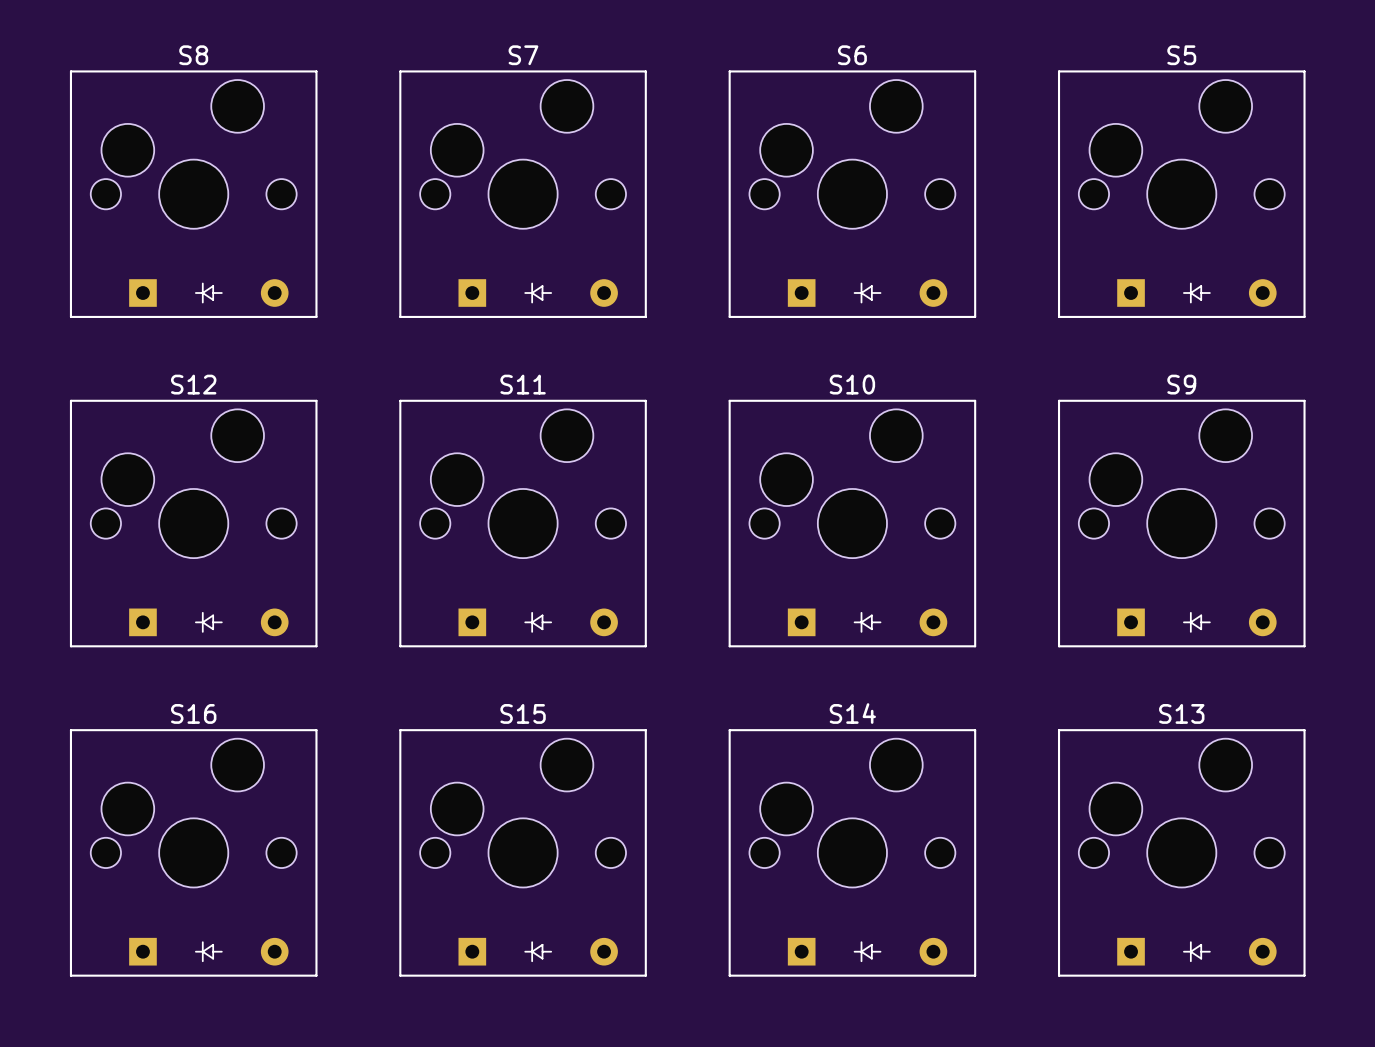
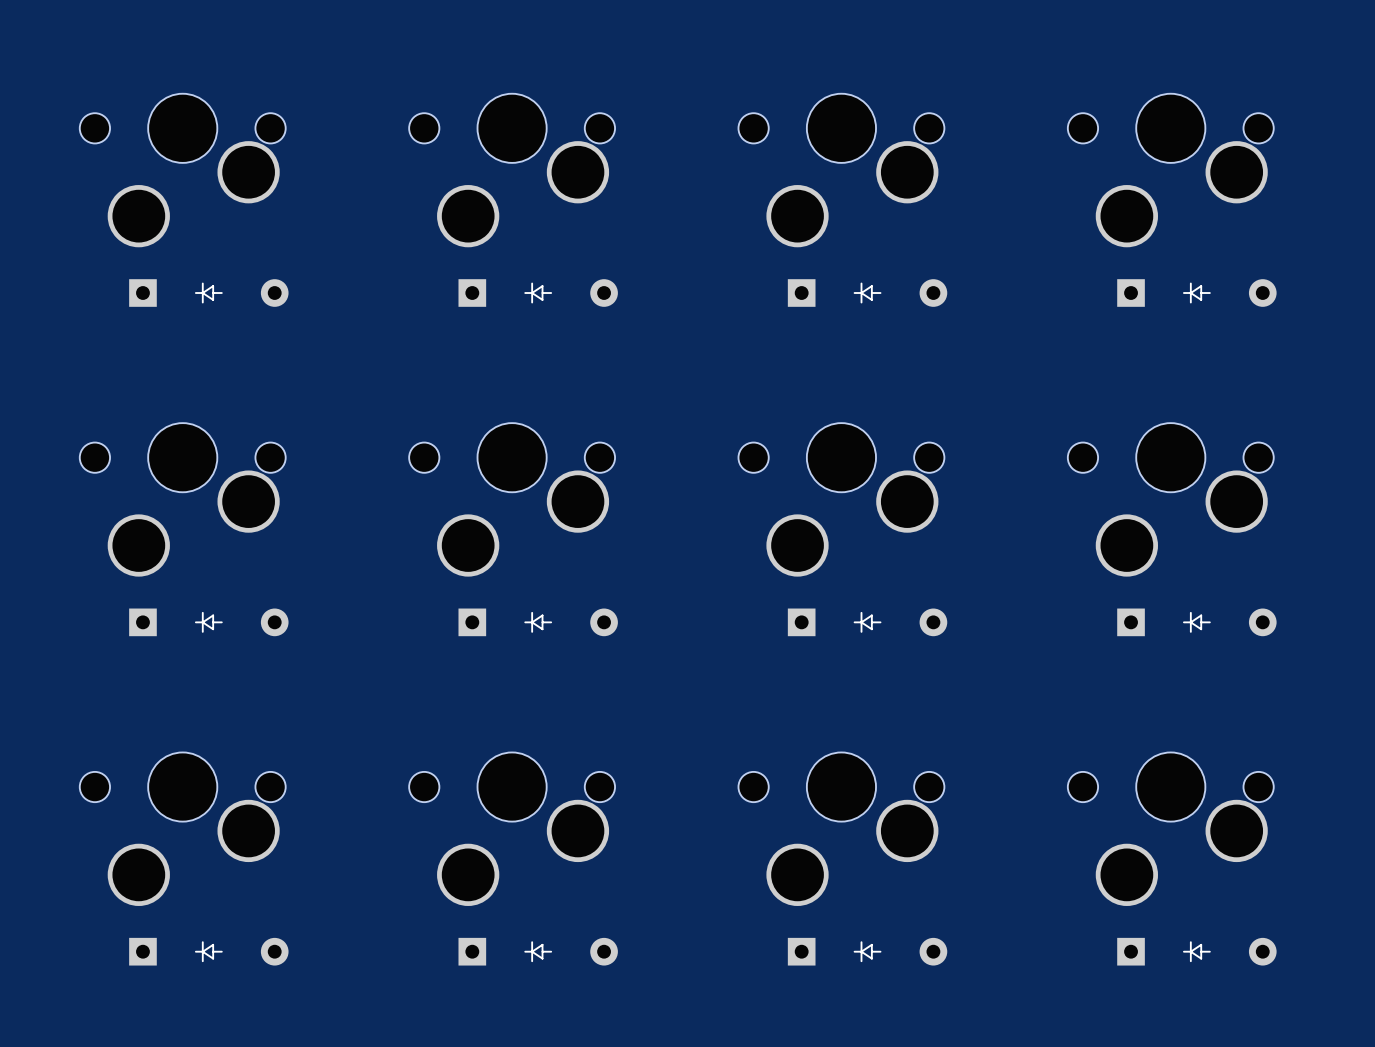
part: none -> (182, 170)
part: none -> (512, 170)
part: none -> (841, 170)
part: none -> (1170, 170)
S8: (193, 194) -> none
S7: (523, 194) -> none
S6: (852, 194) -> none
S5: (1181, 194) -> none
part: none -> (182, 499)
part: none -> (512, 499)
part: none -> (841, 499)
part: none -> (1170, 499)
S12: (193, 523) -> none
S11: (523, 523) -> none
S10: (852, 523) -> none
S9: (1181, 523) -> none
part: none -> (182, 829)
part: none -> (512, 829)
part: none -> (841, 829)
part: none -> (1170, 829)
S16: (193, 852) -> none
S15: (523, 852) -> none
S14: (852, 852) -> none
S13: (1181, 852) -> none

